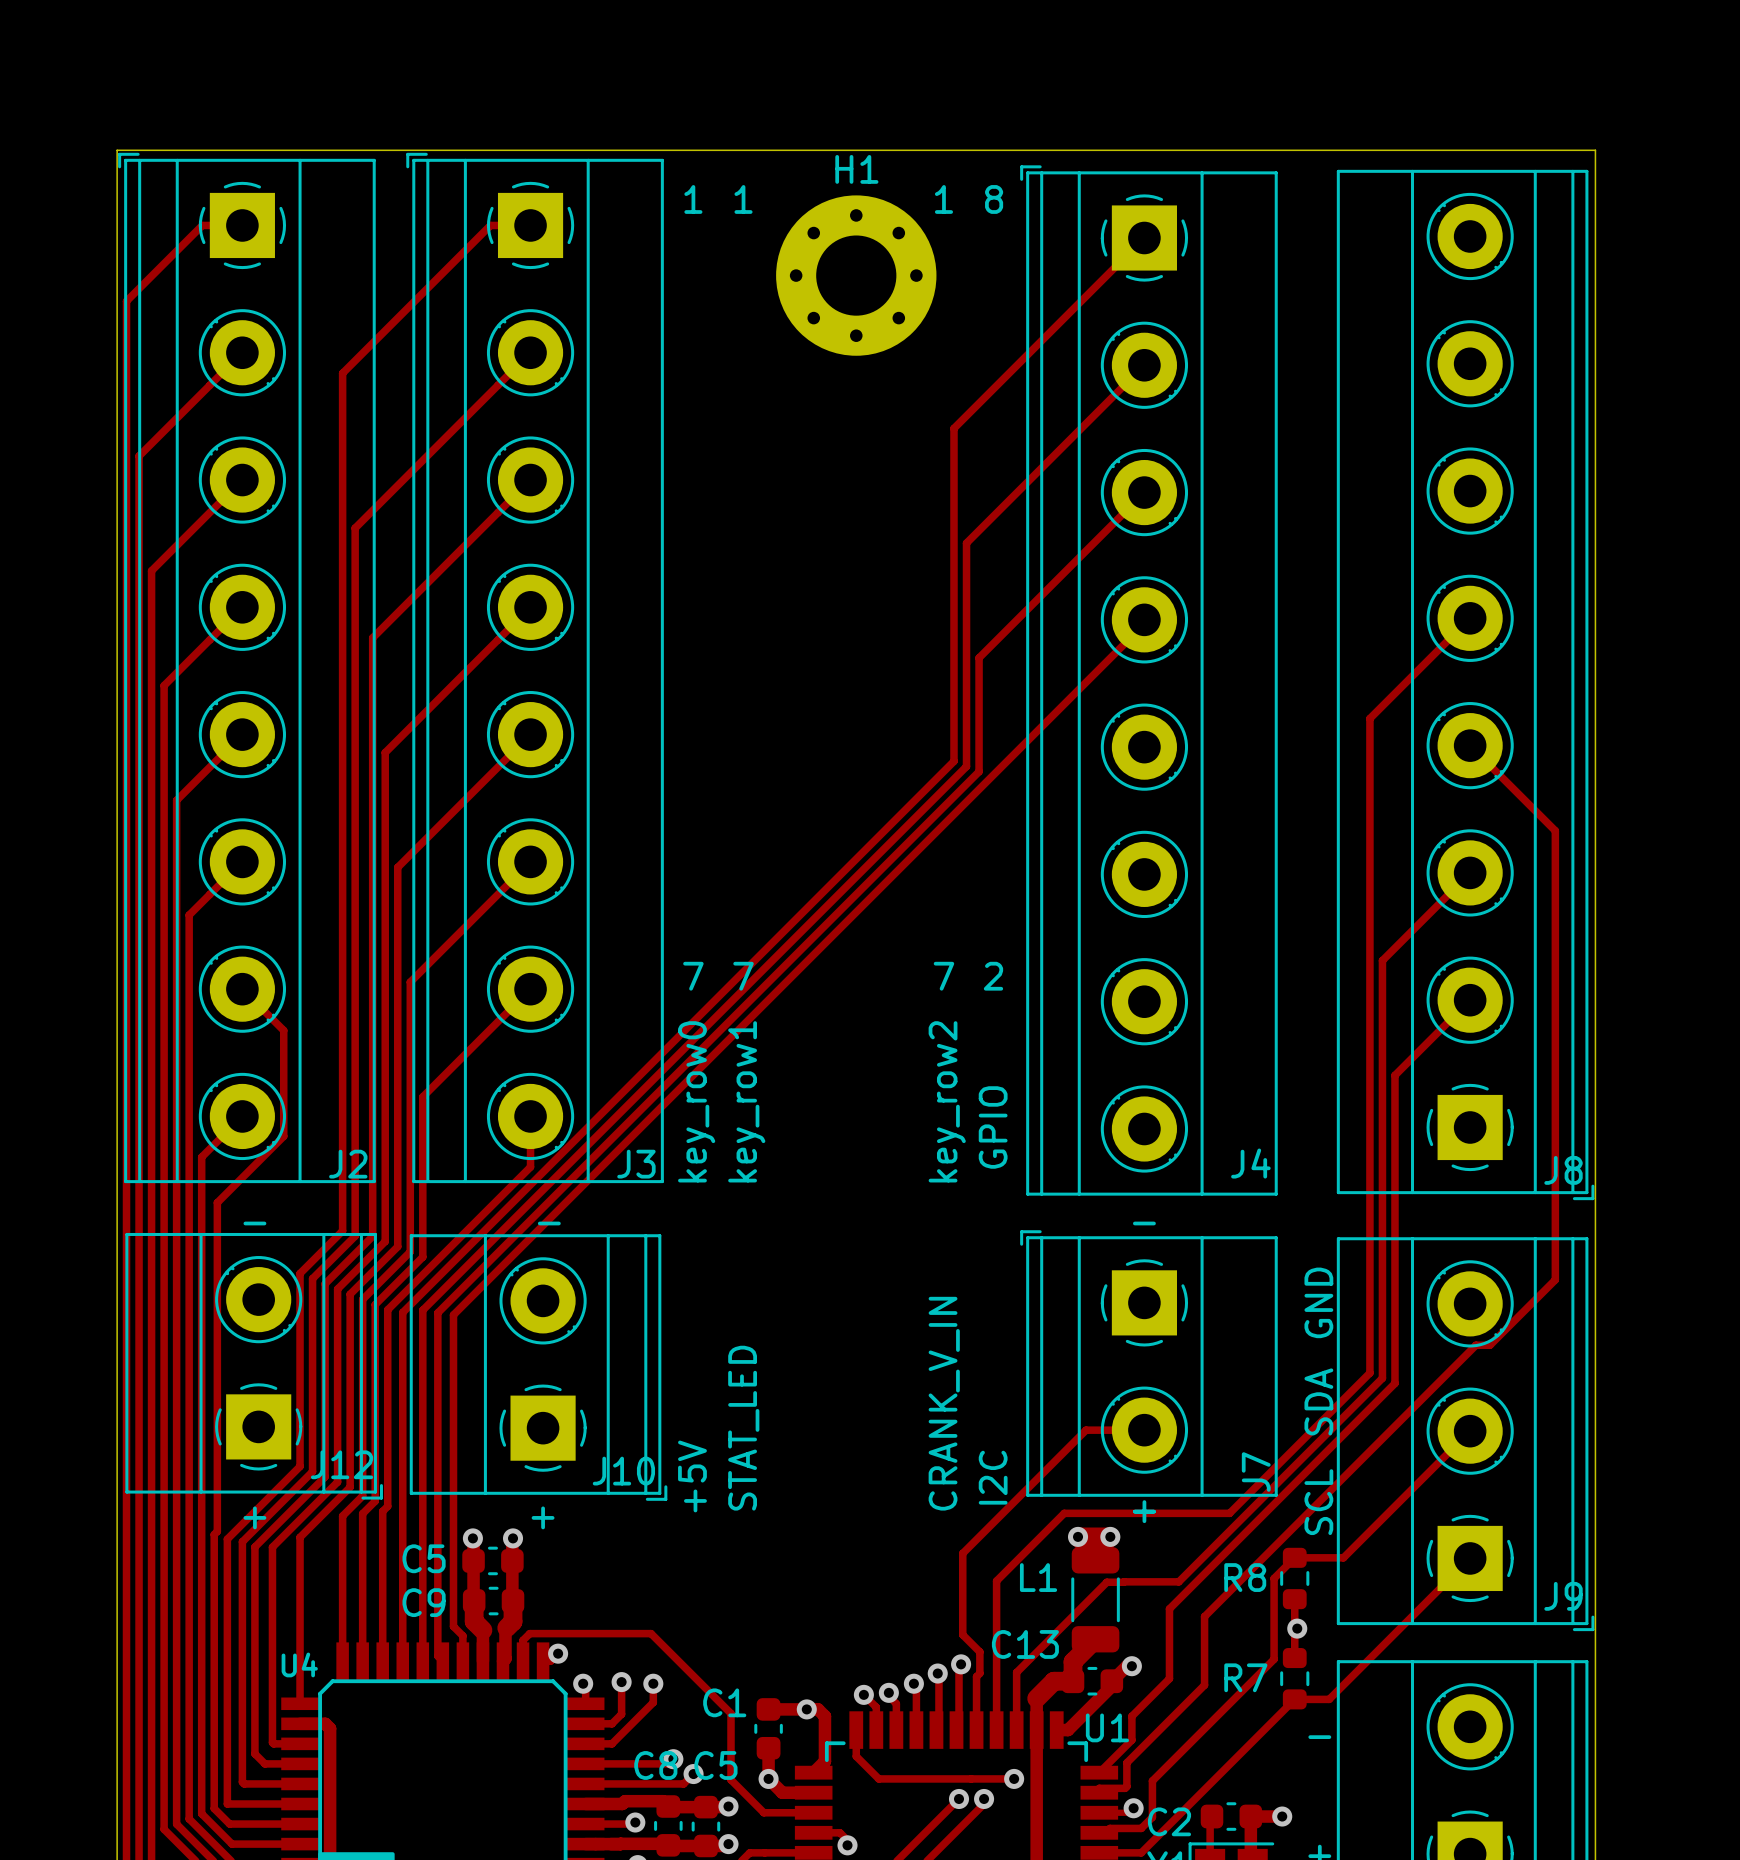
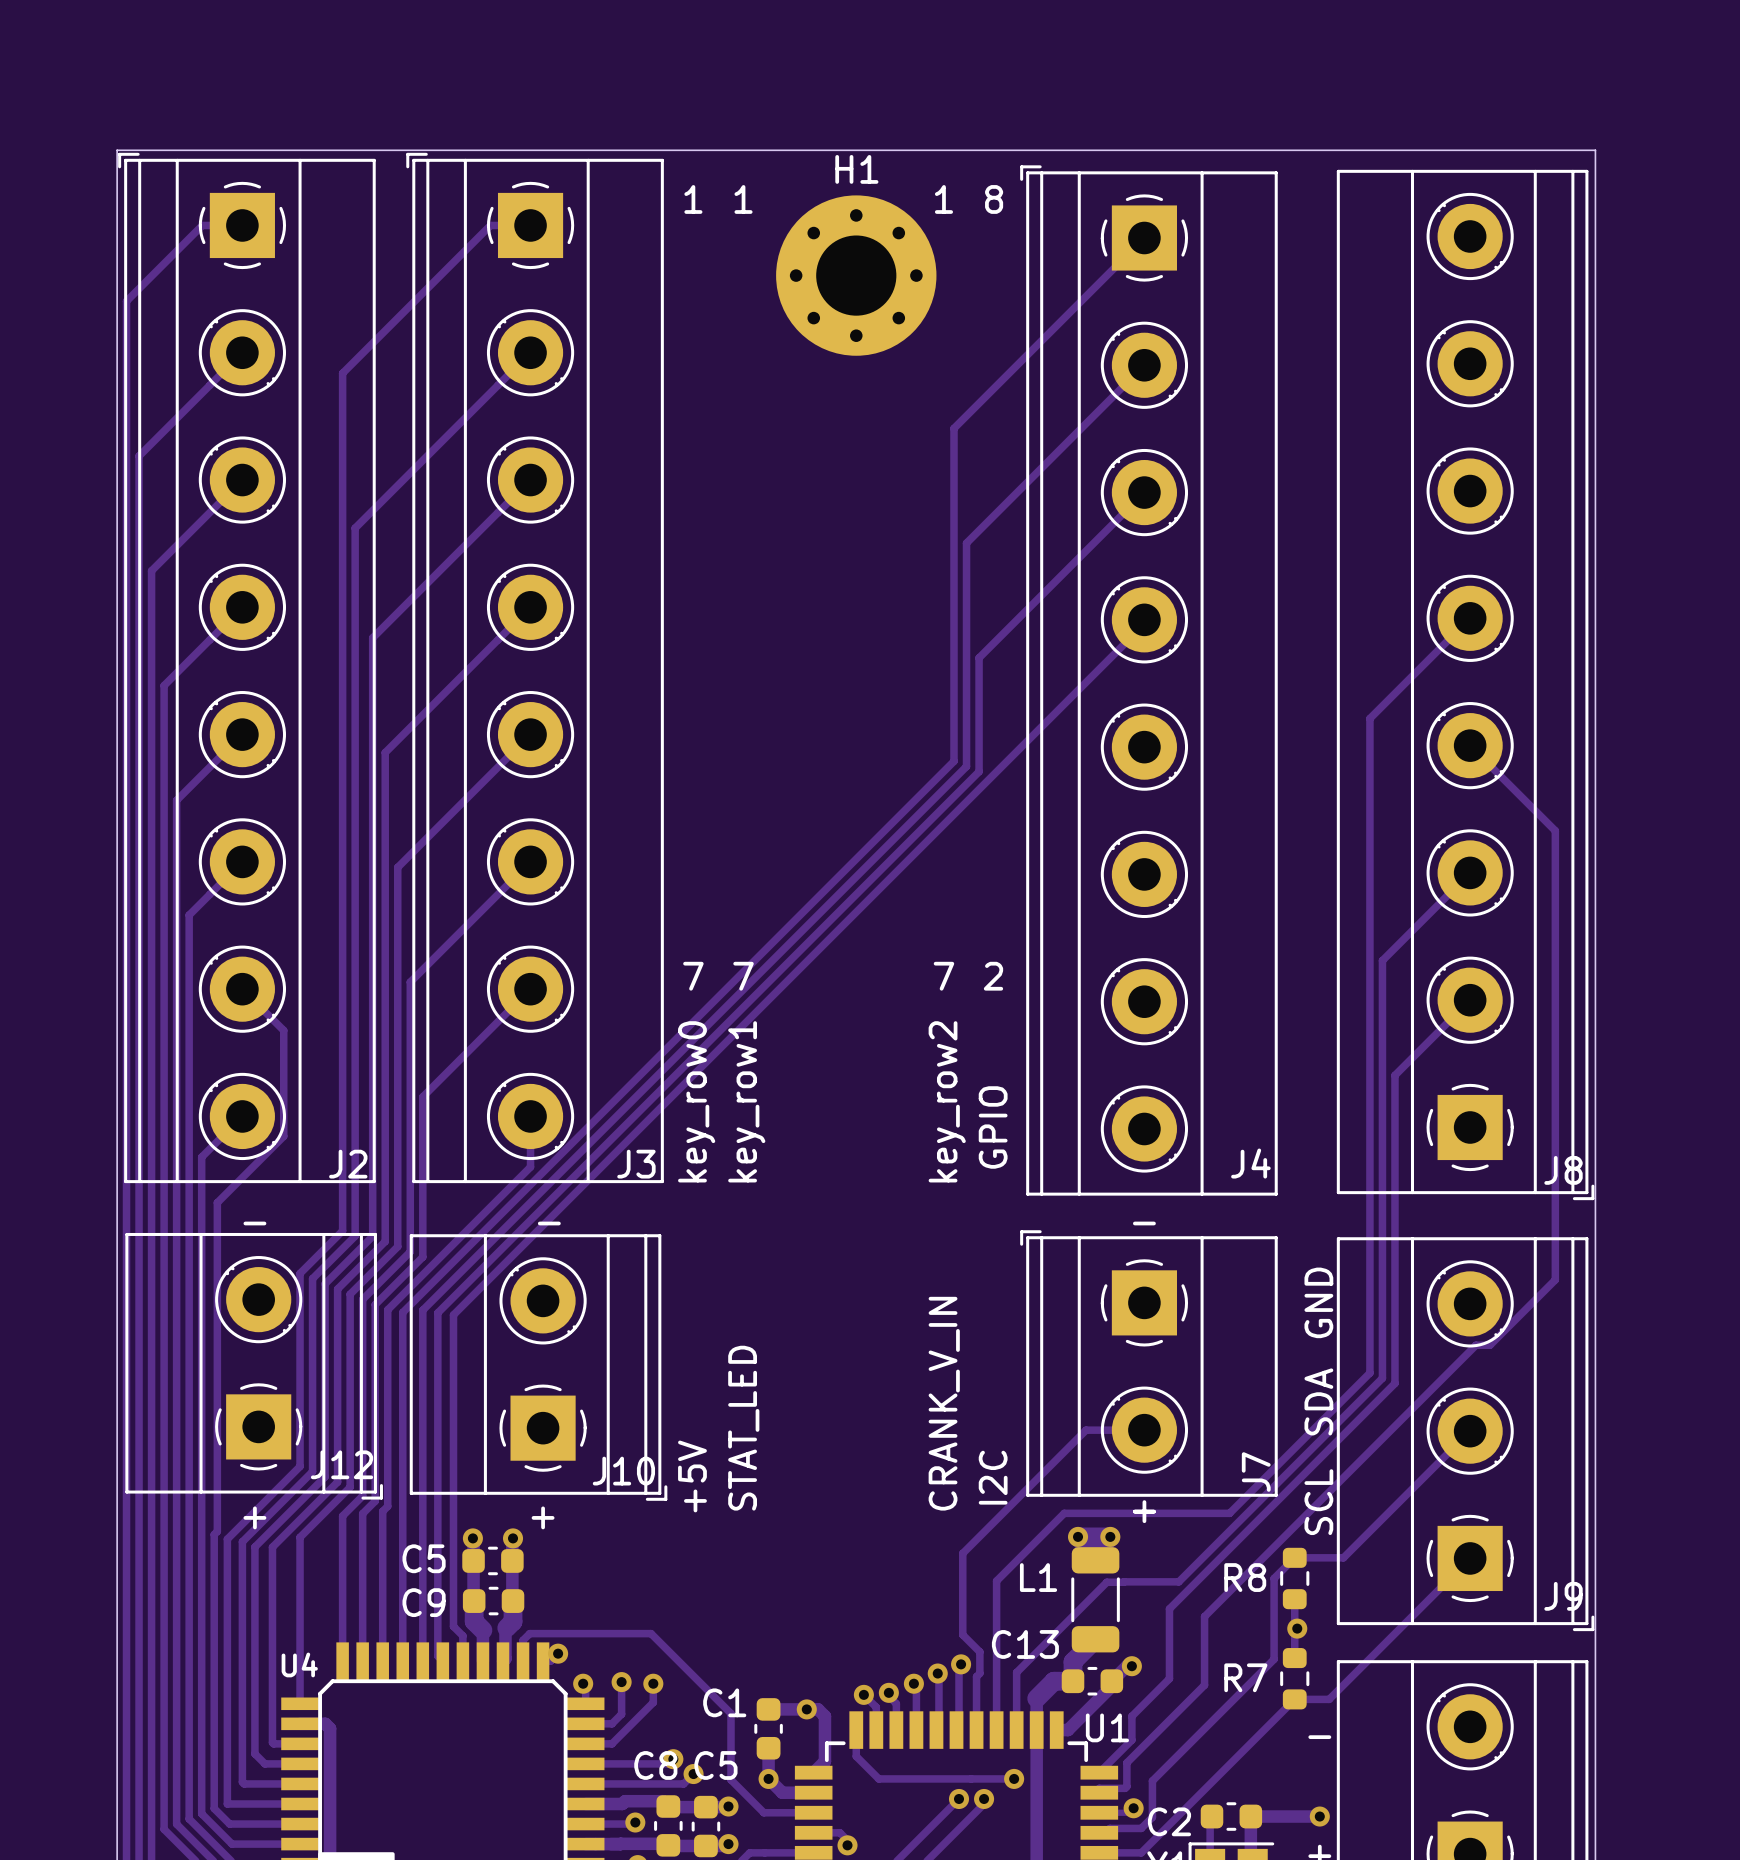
track: none -> (1282, 1816) (1319, 1816)
via position: (1282, 1816) -> (1319, 1816)

